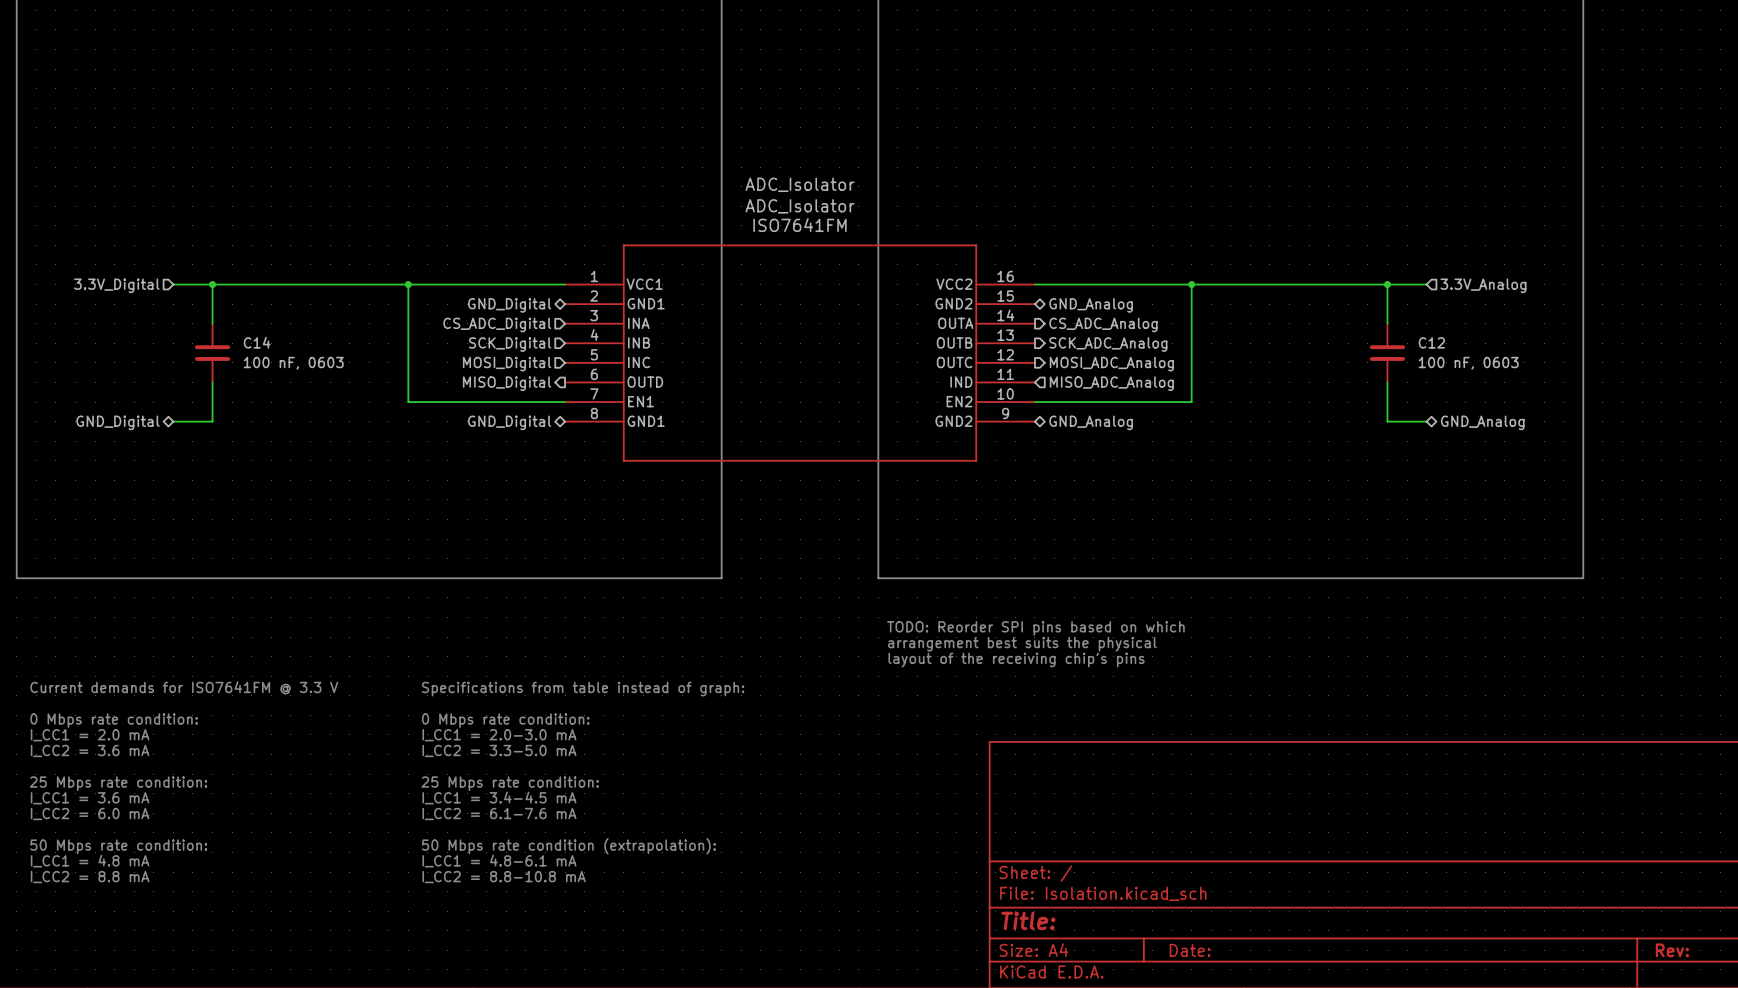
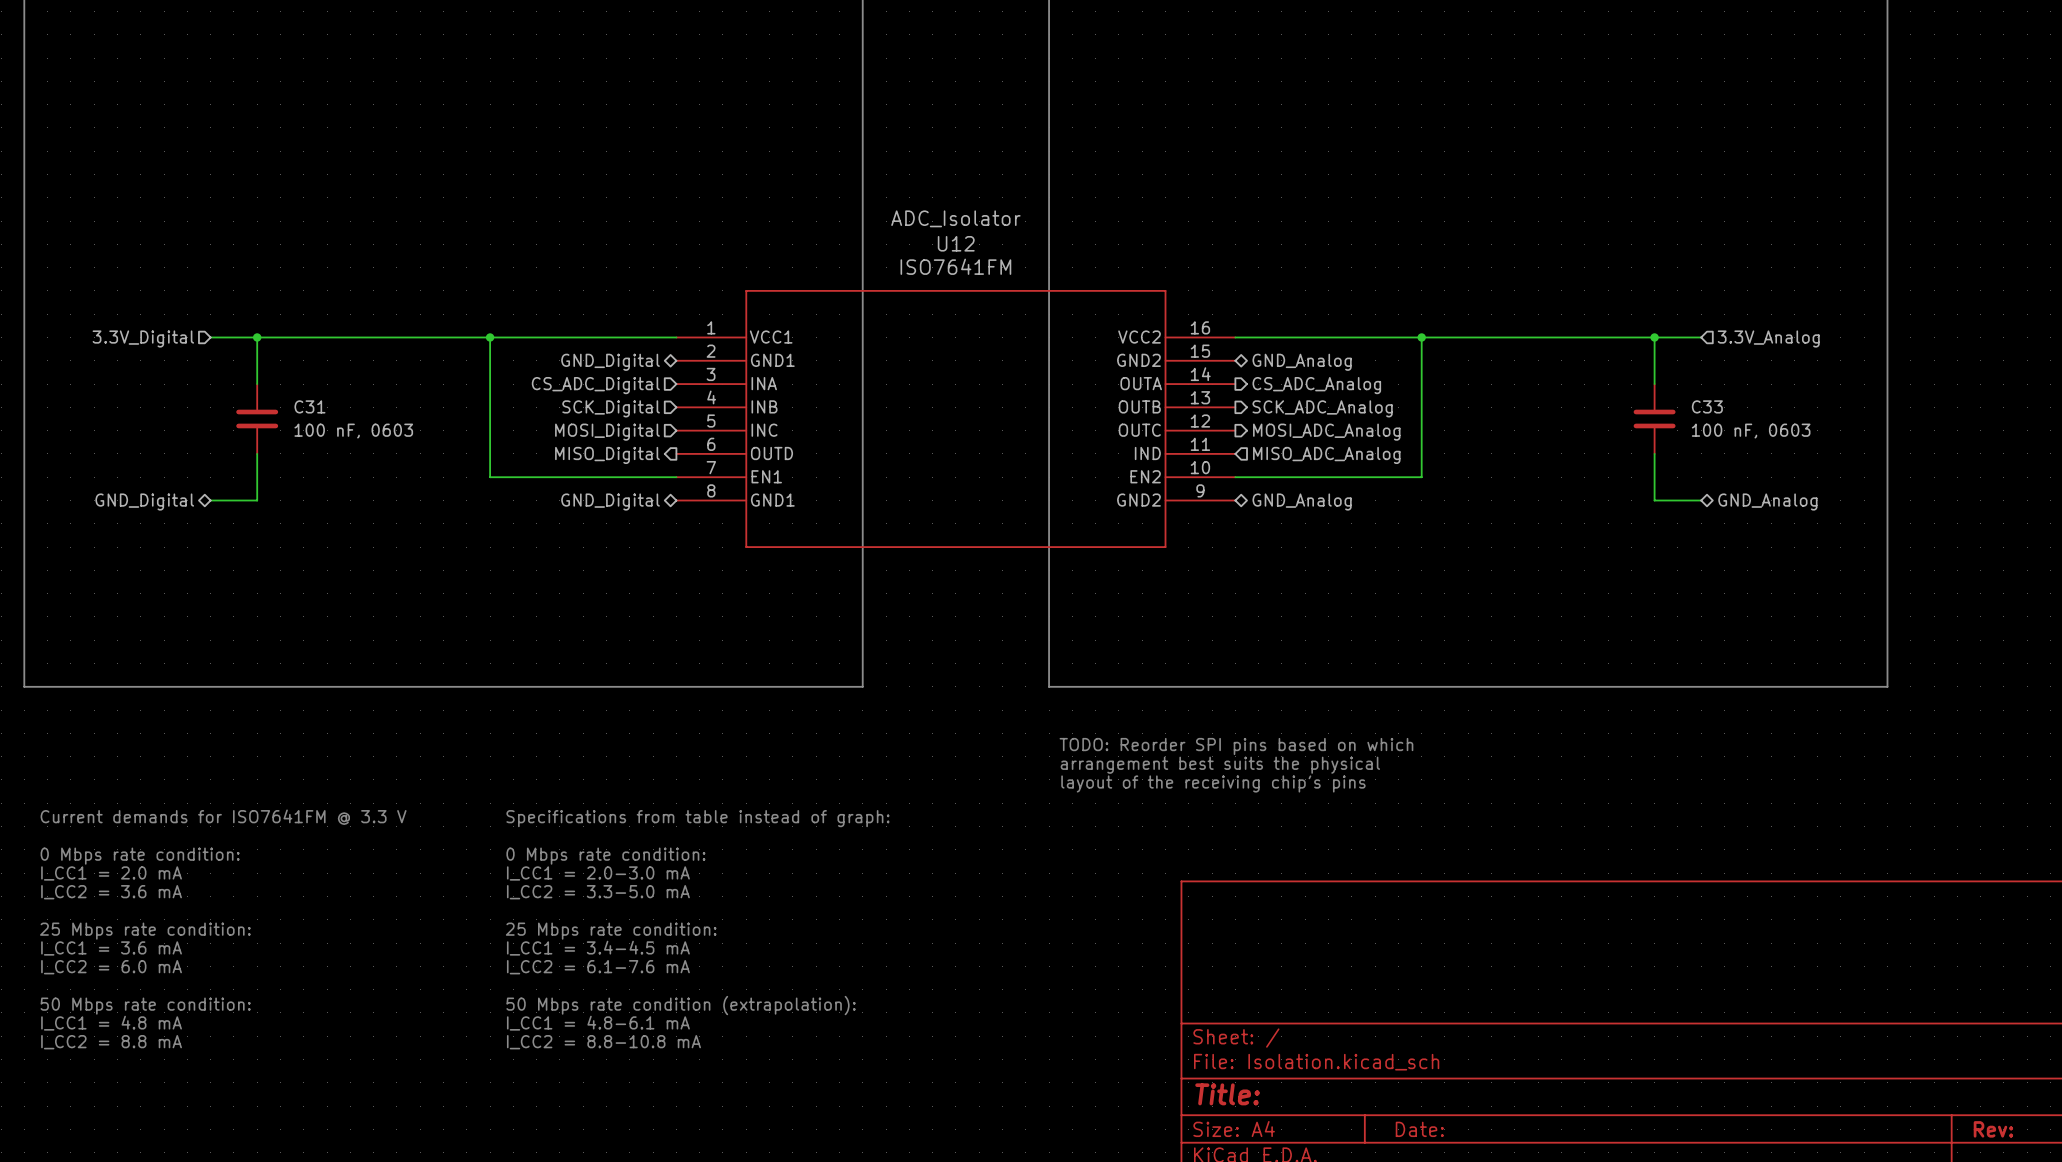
ADC_Isolator name: ADC_Isolator (800, 206) -> U12 (956, 243)
C14 name: C14 (257, 342) -> C31 (309, 406)
C12 name: C12 (1431, 342) -> C33 (1707, 406)

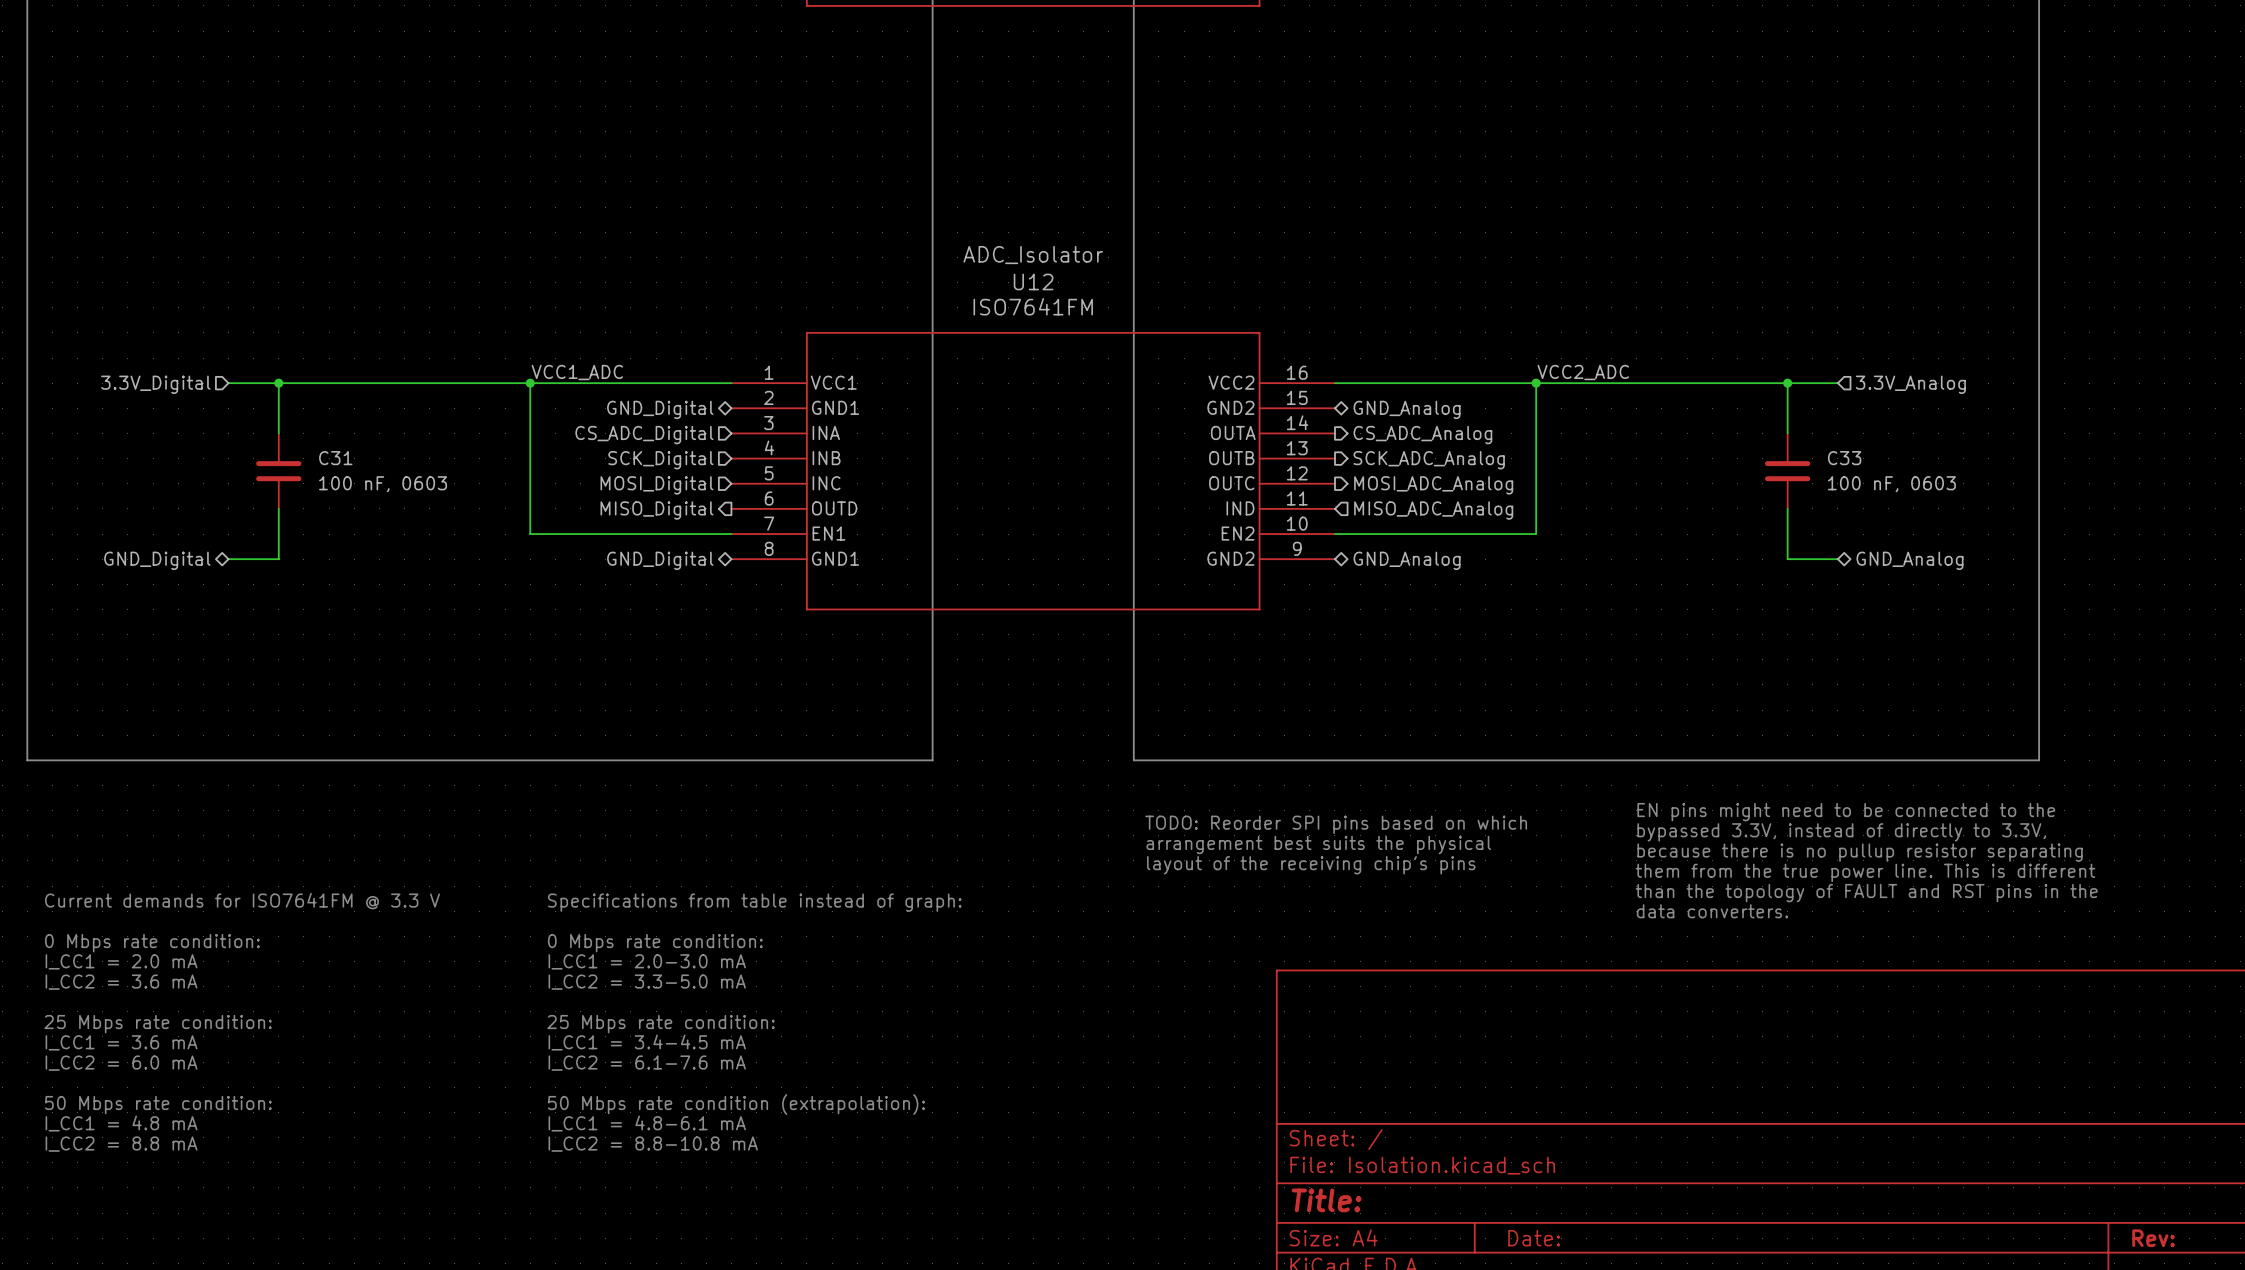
label: none -> VCC1_ADC (577, 372)
label: none -> VCC2_ADC (1583, 372)
text: none -> EN pins might need to be connected to the (1846, 812)
text: none -> bypassed 3.3V, instead of directly to 3.3V, (1841, 832)
text: none -> because there is no pullup resistor separating (1860, 852)
text: none -> them from the true power line. This is different (1865, 872)
text: none -> than the topology of FAULT and RST pins in the (1866, 893)
text: none -> data converters. (1712, 911)

